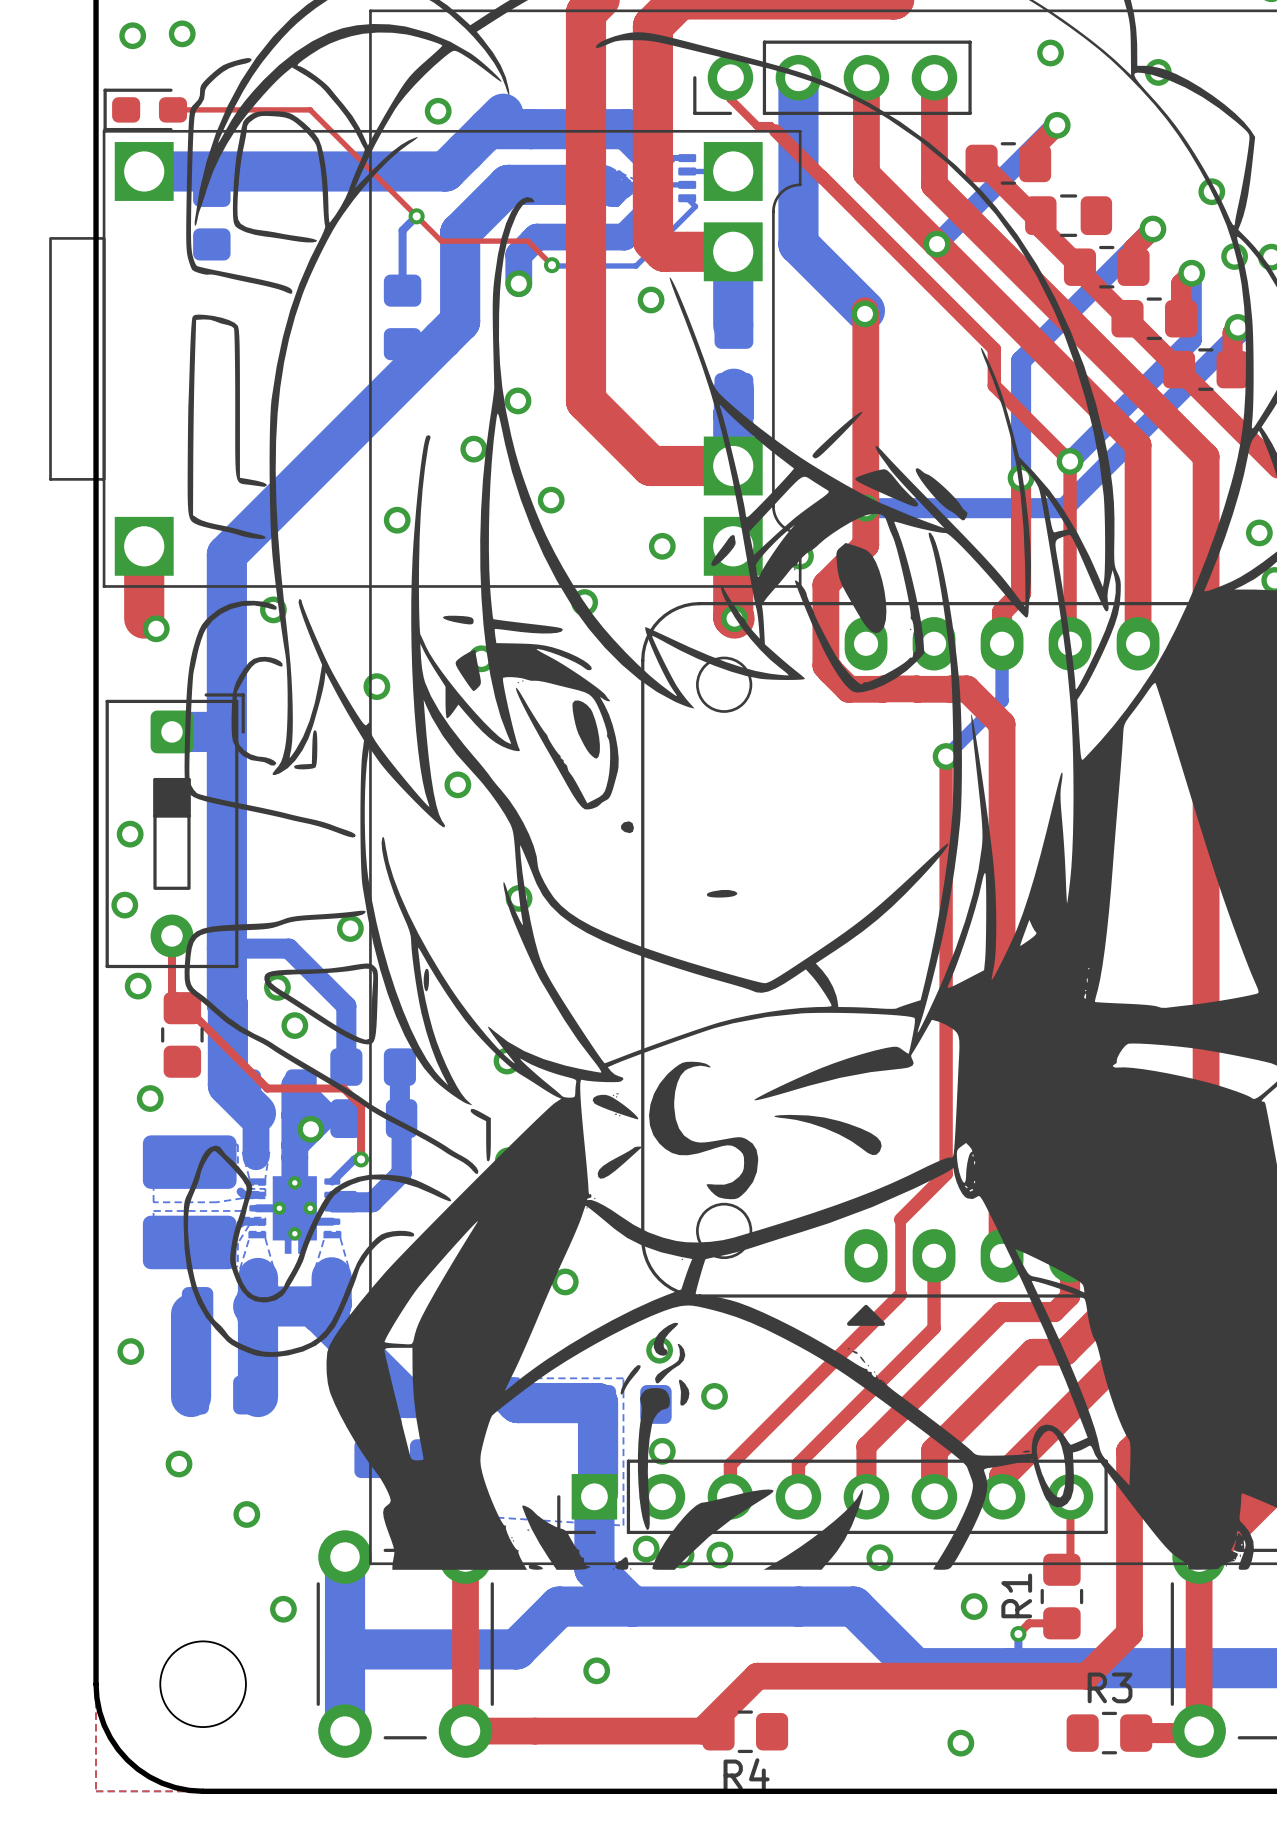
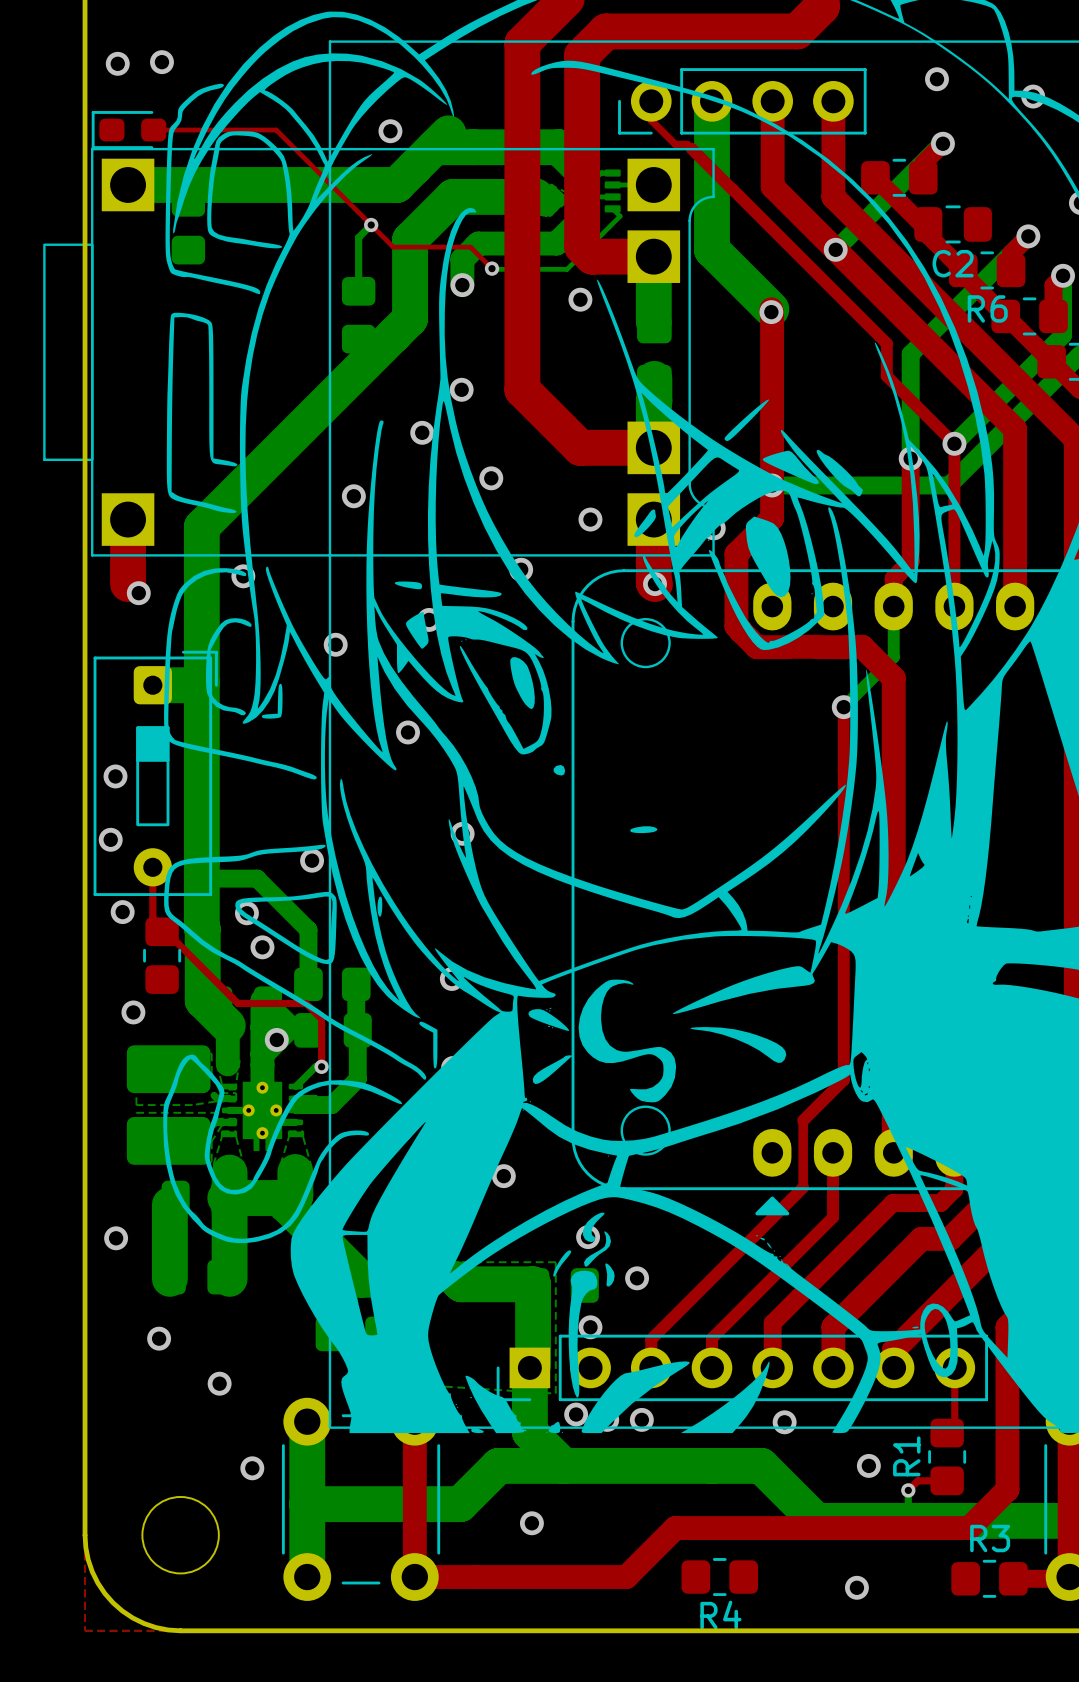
C2 name: none -> C2 (953, 263)
R6 name: none -> R6 (987, 308)
R4 position: (745, 1731) -> (719, 1577)

